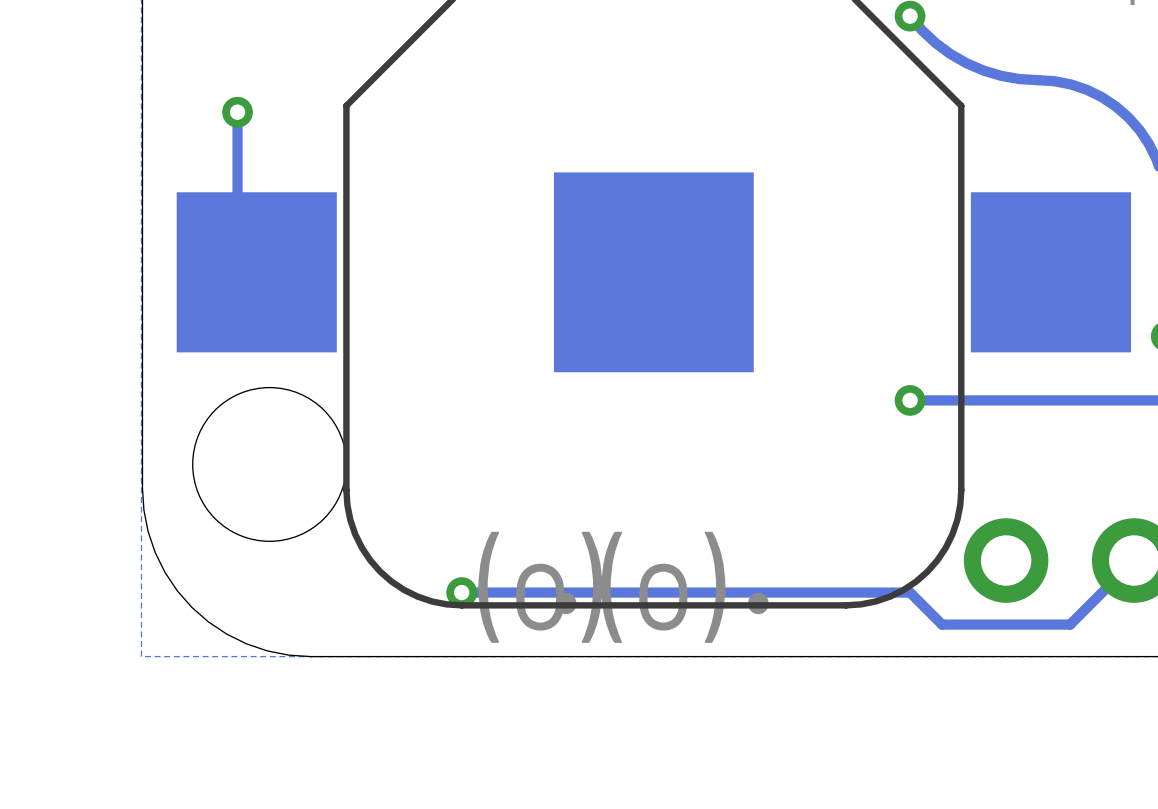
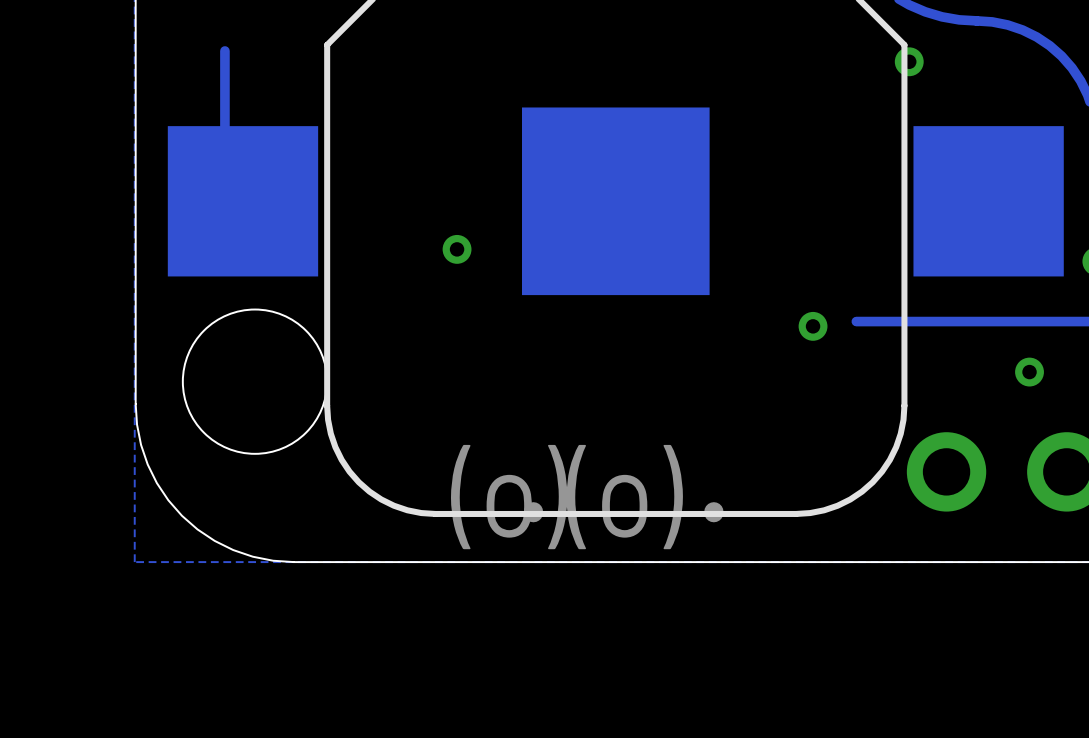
via: (237, 112) -> none
via: none -> (909, 61)
via: none -> (457, 249)
via position: (910, 400) -> (813, 326)
via: none -> (1029, 372)
track: (1134, 560) (1070, 624) (942, 624) (910, 592) (461, 592) -> none
via: (461, 592) -> none

